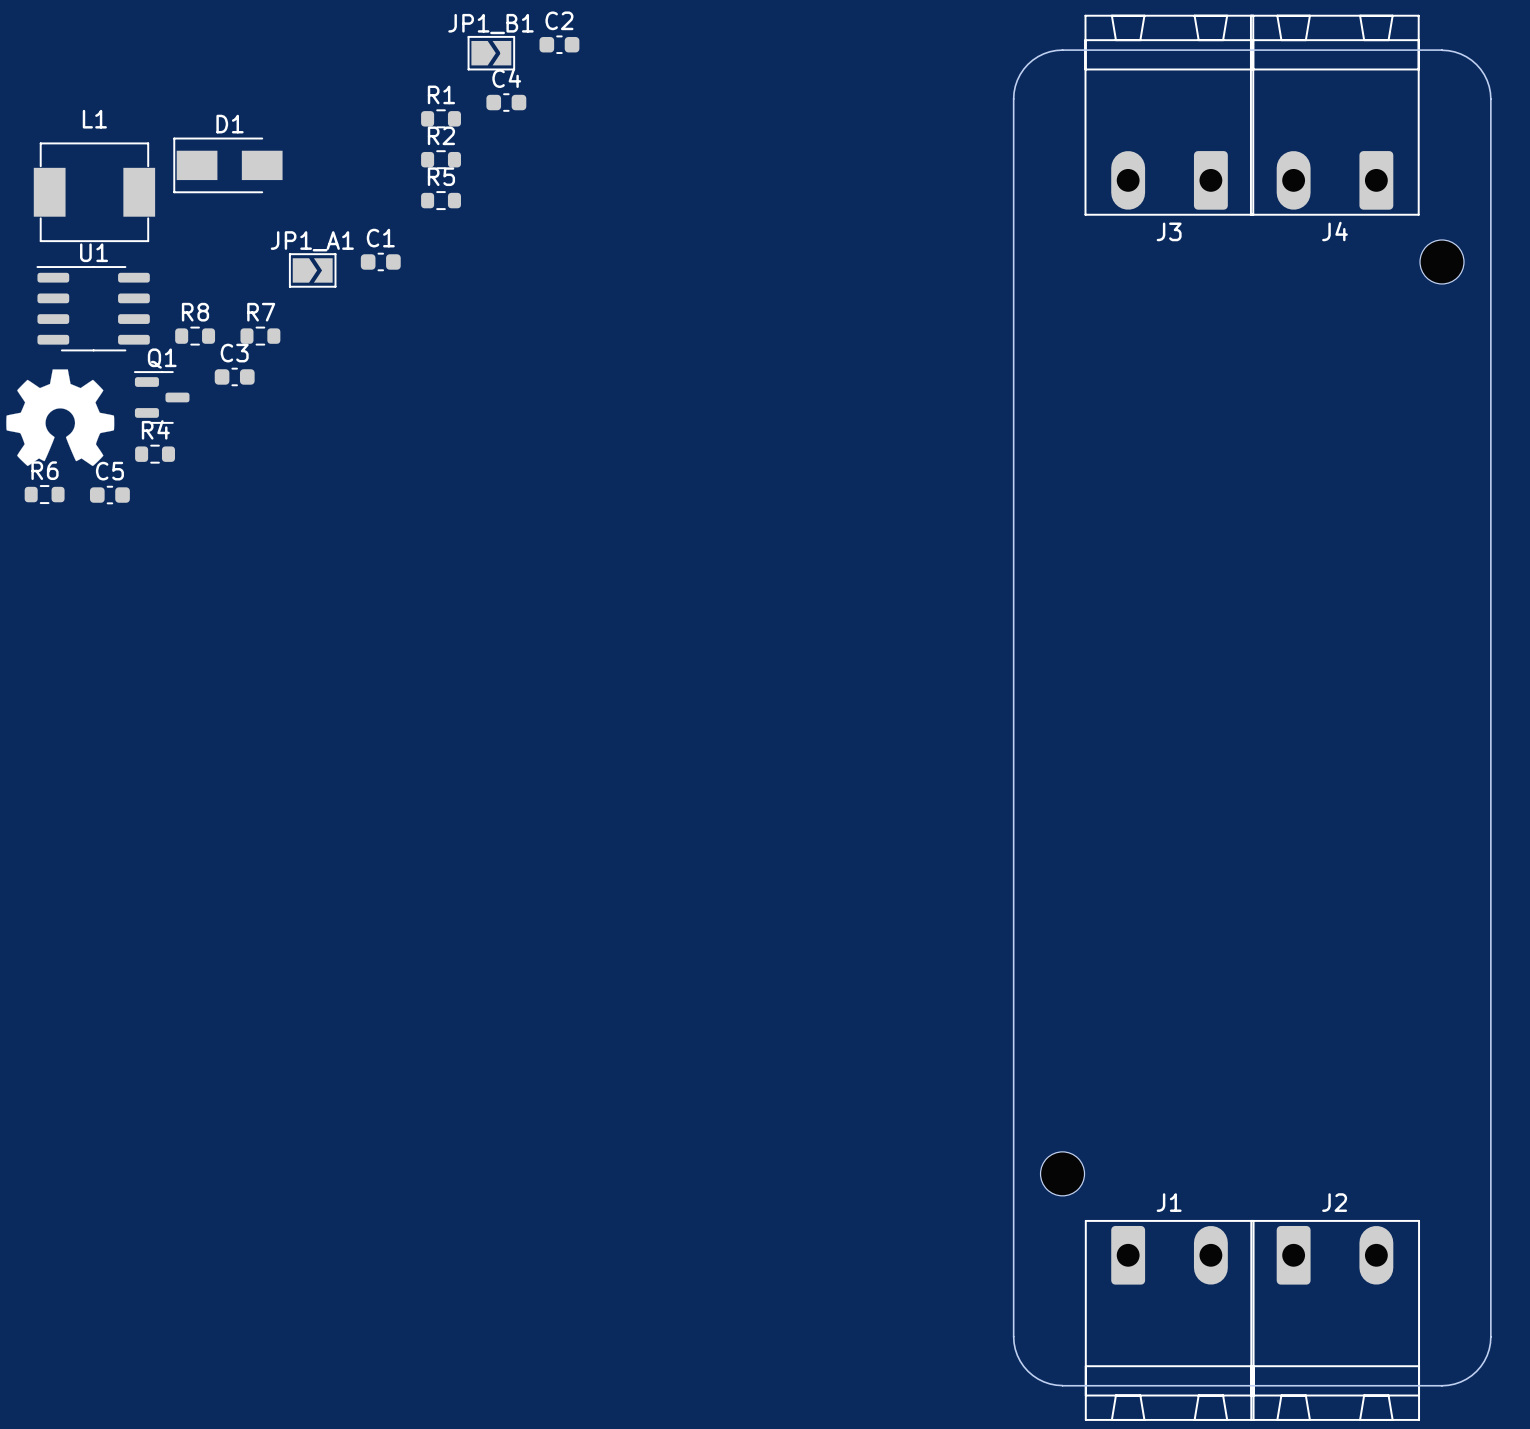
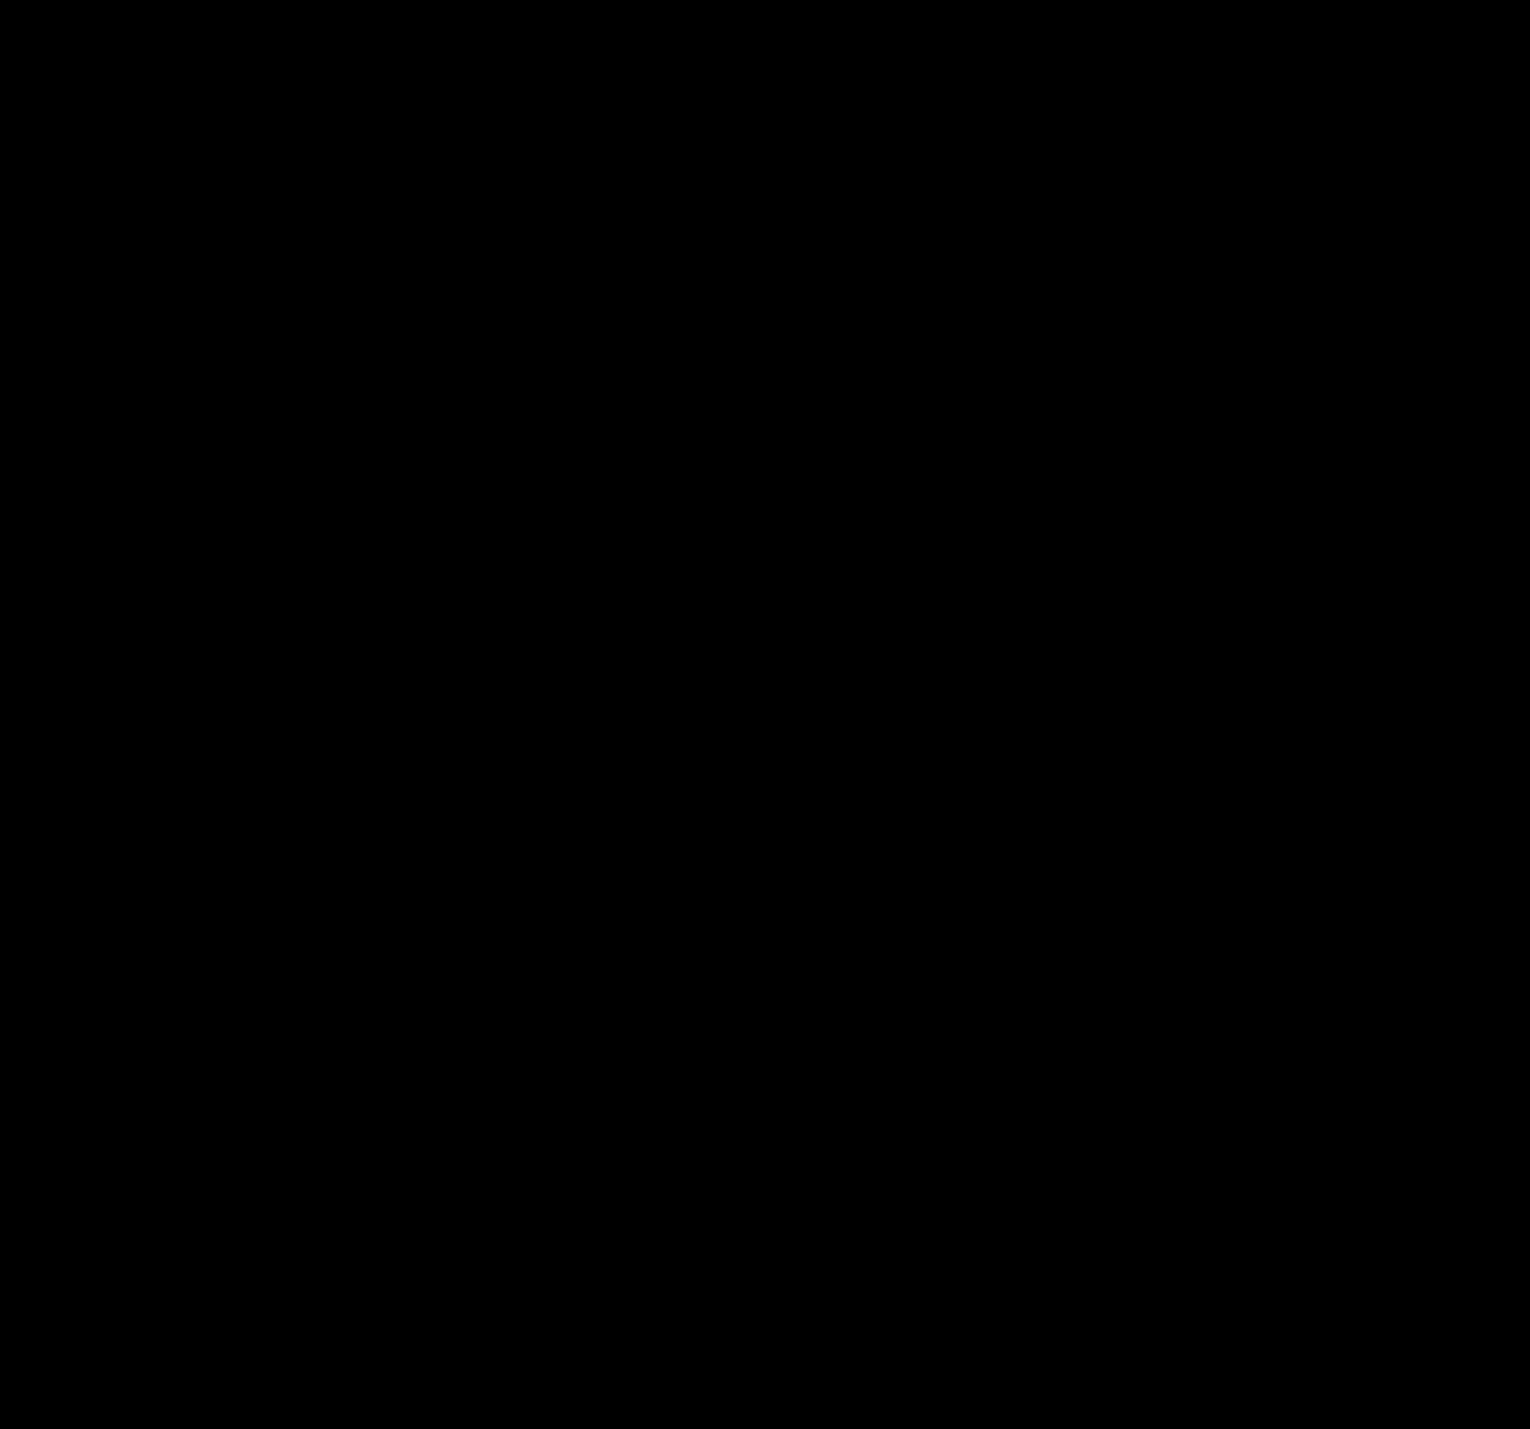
C2: (559, 44) -> none
board edge: (1442, 50) (1056, 50) (1043, 53) (1032, 60) (1023, 69) (1015, 86) (1013, 98) (1013, 1336) (1017, 1355) (1027, 1371) (1043, 1381) (1062, 1385) -> none
board edge: (1442, 50) (1460, 53) (1476, 64) (1487, 80) (1490, 99) (1490, 1336) (1489, 1349) (1480, 1366) (1471, 1375) (1460, 1382) (1448, 1385) (1062, 1385) -> none
JP1_B1: (491, 53) -> none
C4: (506, 102) -> none
J3: (1169, 115) -> none
J4: (1334, 115) -> none
R1: (441, 118) -> none
R2: (441, 159) -> none
D1: (227, 165) -> none
L1: (94, 192) -> none
R5: (441, 200) -> none
C1: (380, 261) -> none
part: (1442, 261) -> none
JP1_A1: (312, 270) -> none
U1: (93, 308) -> none
R8: (195, 336) -> none
R7: (260, 336) -> none
drawing: [6, 369, 115, 467] -> none
C3: (234, 376) -> none
Q1: (161, 397) -> none
R4: (155, 454) -> none
R6: (44, 494) -> none
C5: (109, 495) -> none
part: (1062, 1173) -> none
J1: (1169, 1320) -> none
J2: (1335, 1320) -> none

